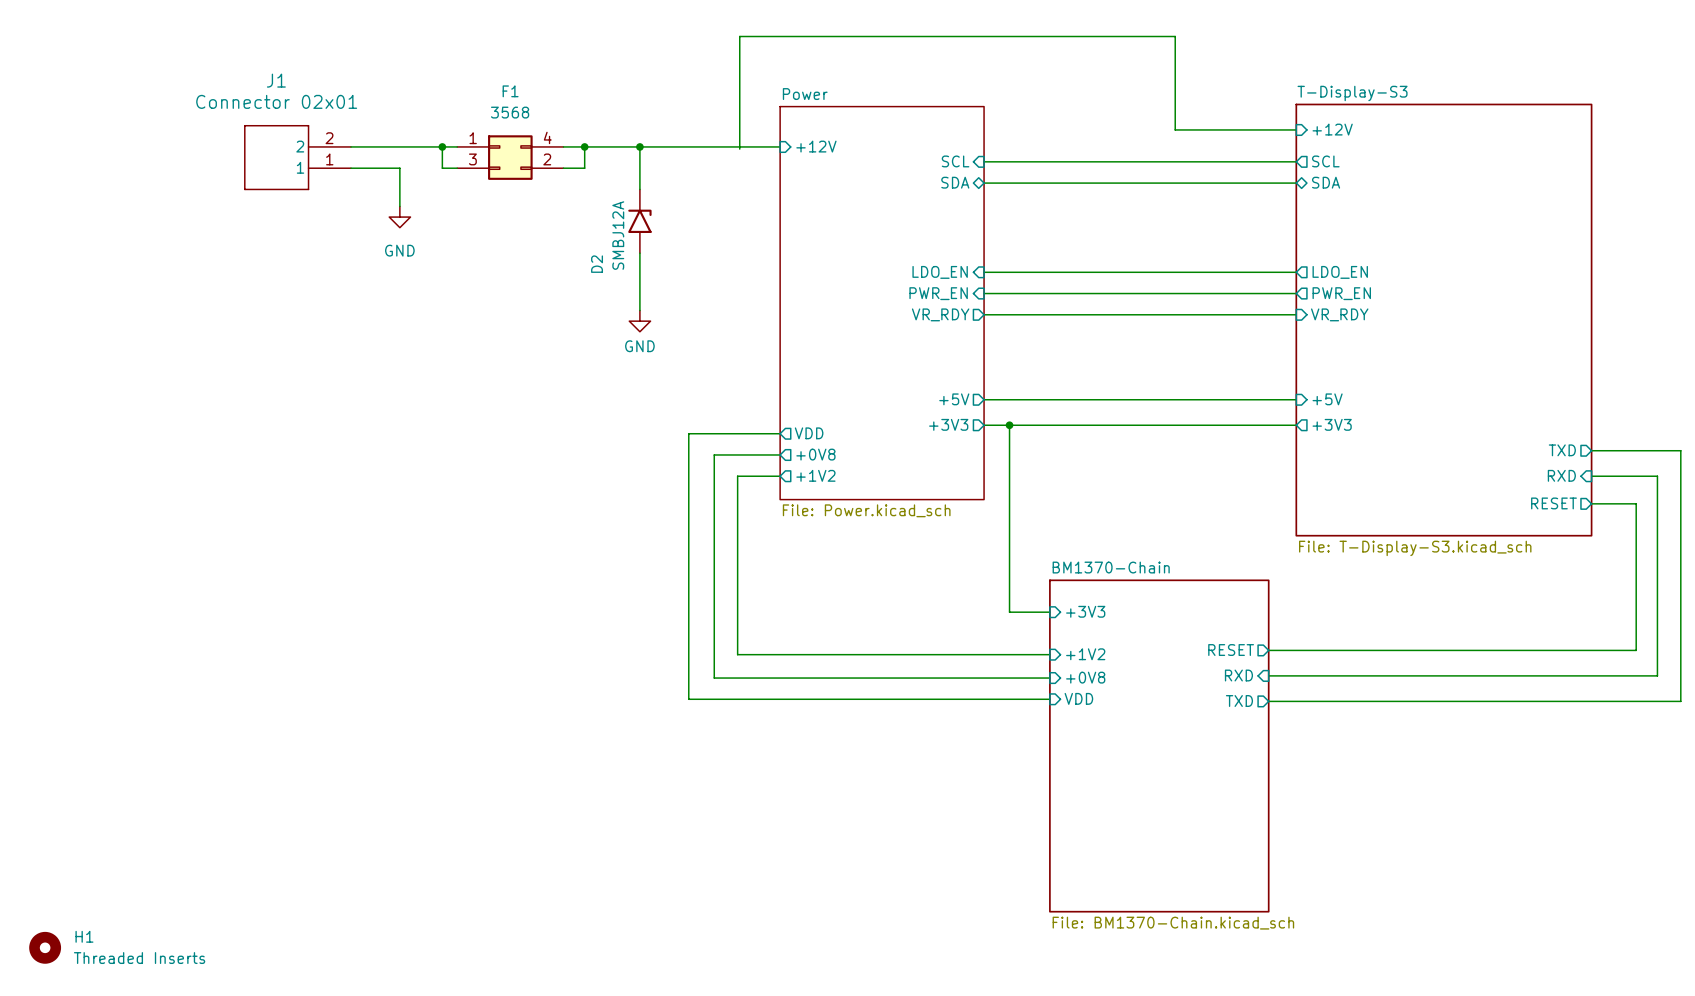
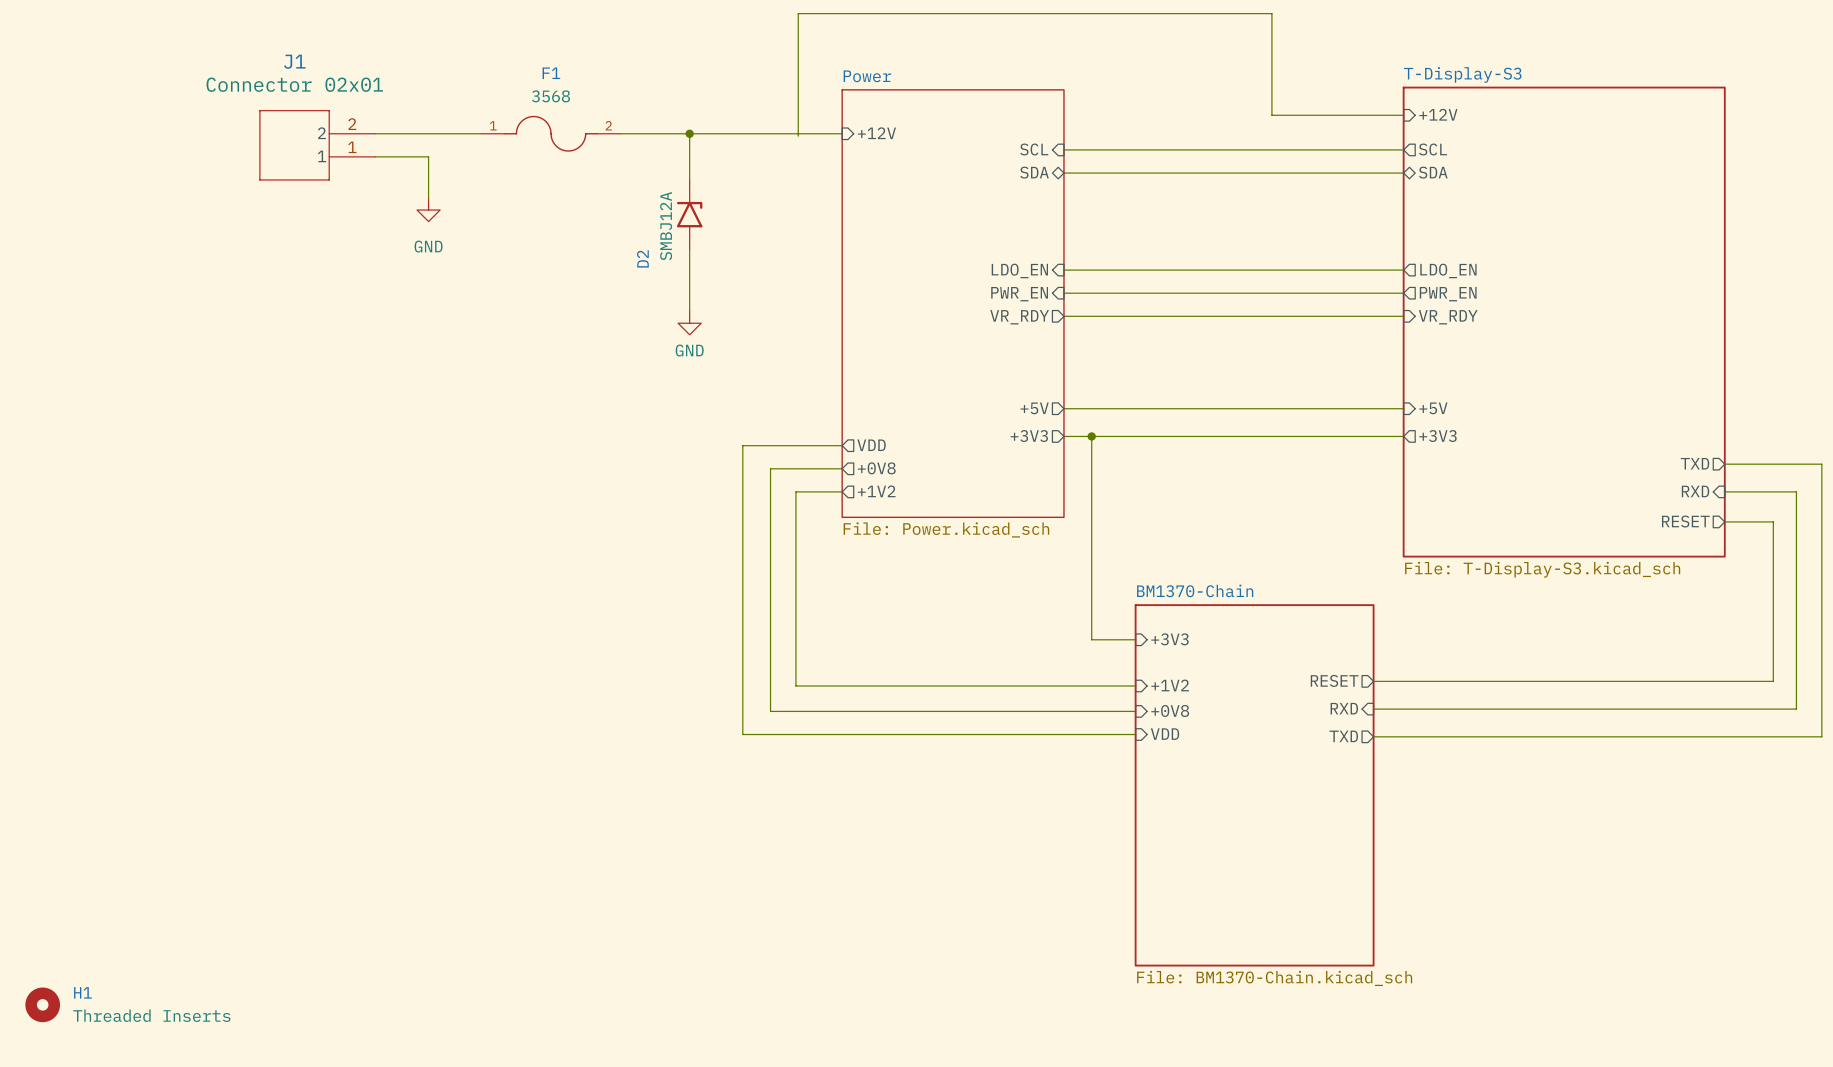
F1 symbol: [457, 135, 564, 180] -> [481, 115, 621, 152]
wire: (442, 146) (442, 168) (457, 168) -> none
junction: (442, 146) -> none
wire: (584, 146) (584, 168) (563, 168) -> none
junction: (584, 146) -> none

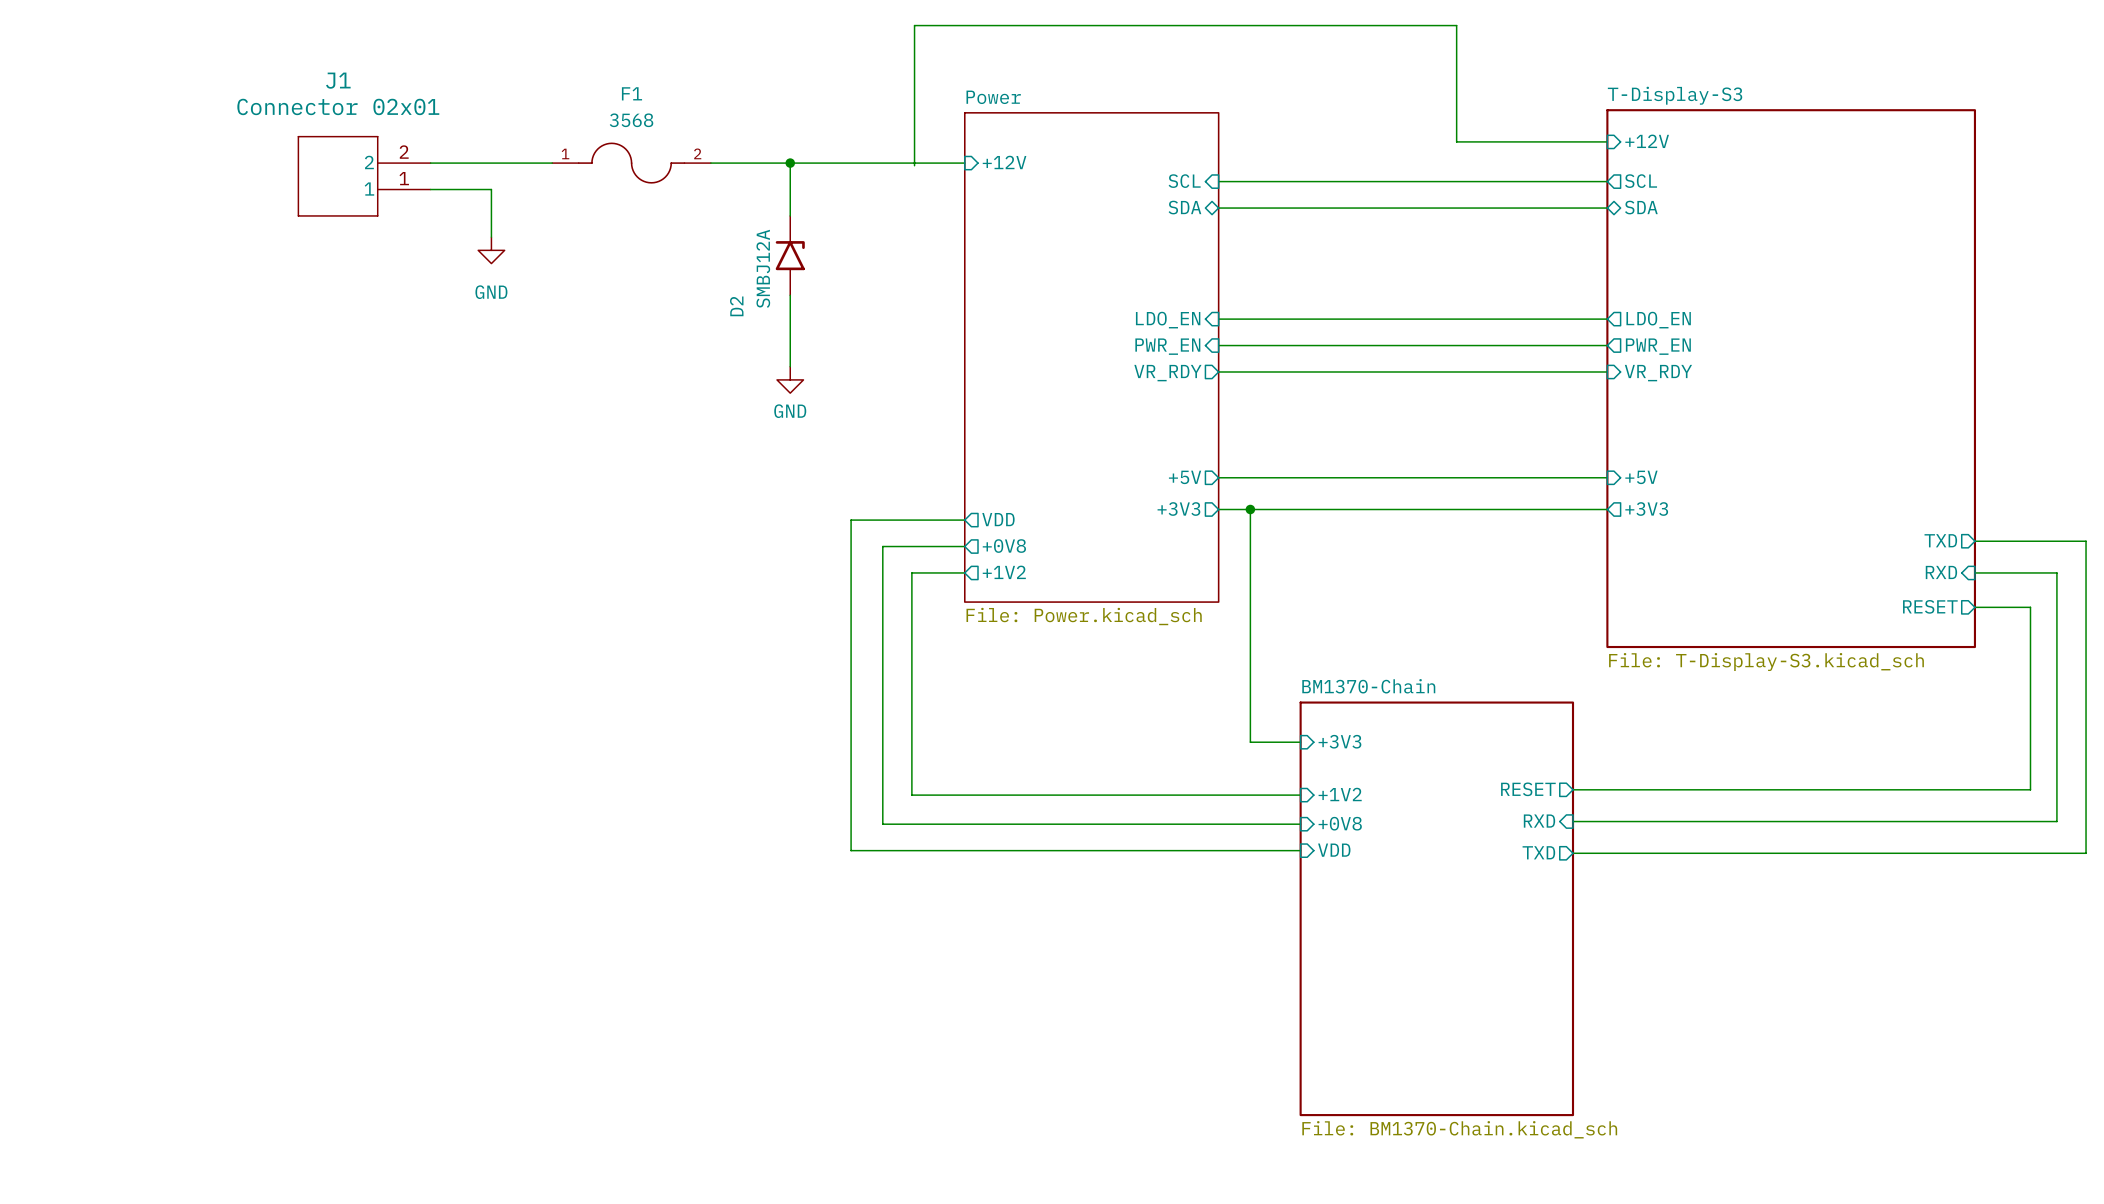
H1: Threaded Inserts (42, 1004) -> none

